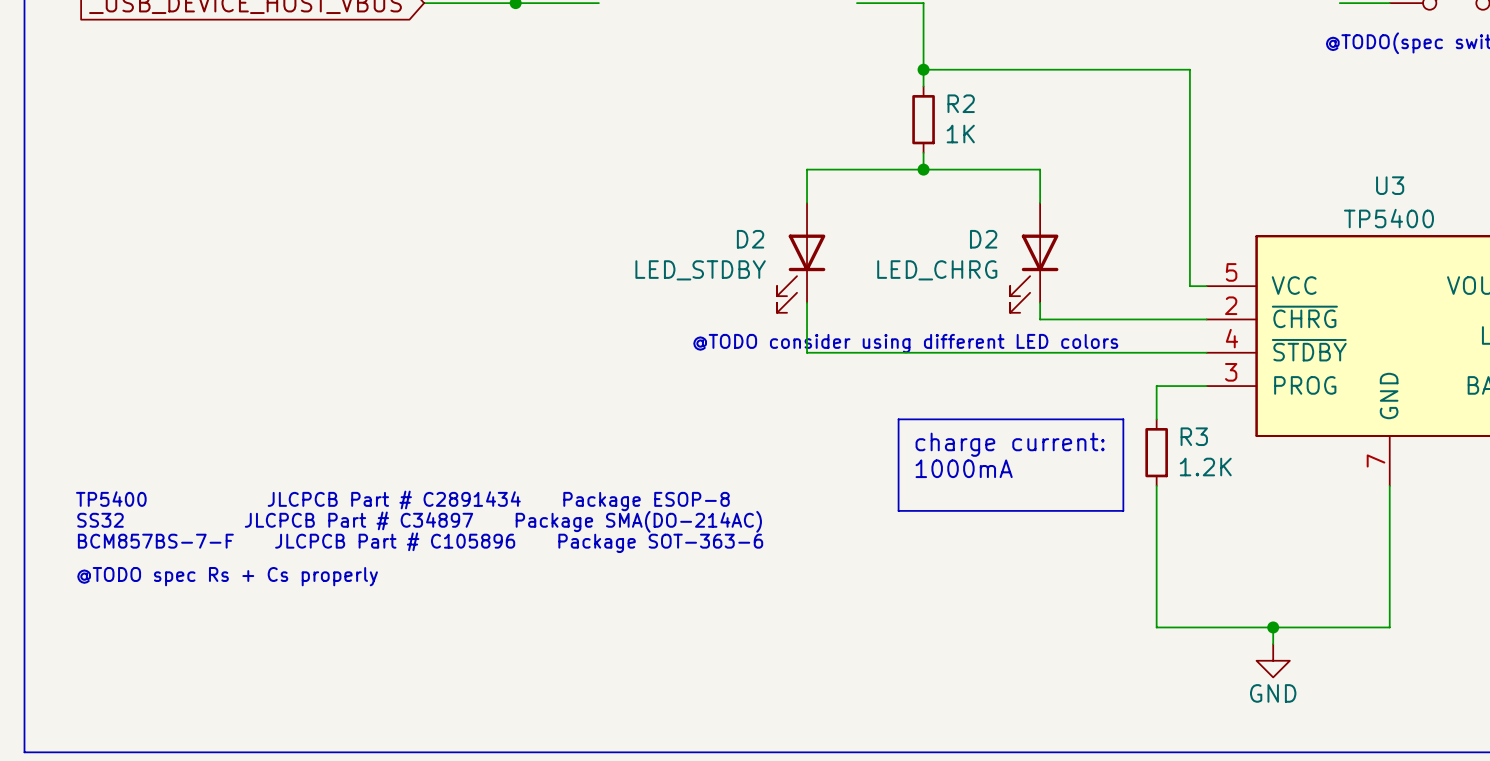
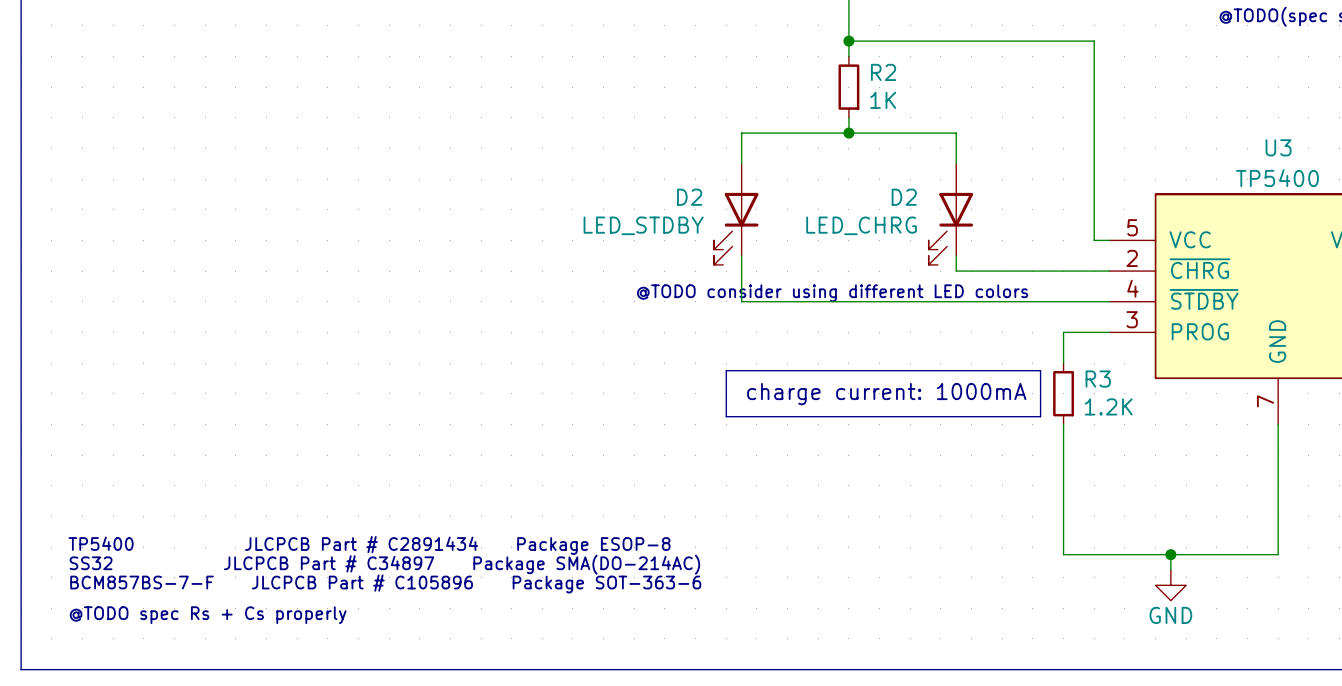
line: (898, 419) (1123, 419) (1123, 510) (898, 510) (898, 419) -> none
line: none -> (726, 370) (1040, 370) (1040, 416) (726, 416) (726, 370)
text: charge current: (1010, 444) -> charge current: 1000mA (886, 394)
text: 1000mA (964, 468) -> none
text position: TP5400 JLCPCB Part # C2891434 Package ESOP-8 (402, 500) -> TP5400 JLCPCB Part # C2891434 Package ESOP-8 (369, 545)
text position: SS32 JLCPCB Part # C34897 Package SMA(DO-214AC) (419, 521) -> SS32 JLCPCB Part # C34897 Package SMA(DO-214AC) (384, 564)
text position: BCM857BS-7-F JLCPCB Part # C105896 Package SOT-363-6 (420, 542) -> BCM857BS-7-F JLCPCB Part # C105896 Package SOT-363-6 (385, 583)
text position: @TODO spec Rs + Cs properly (227, 576) -> @TODO spec Rs + Cs properly (208, 615)

